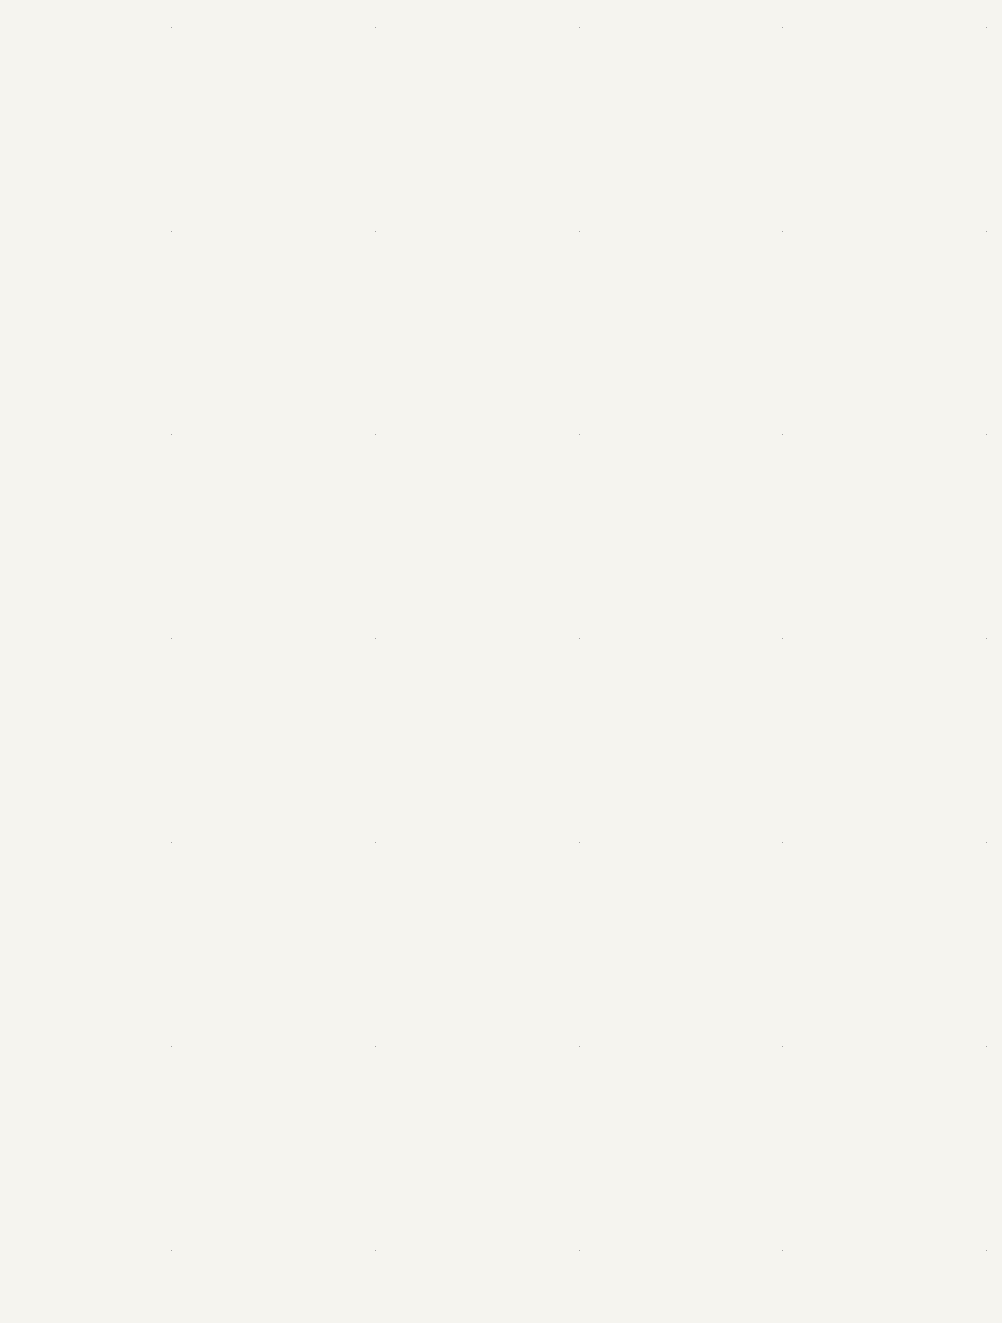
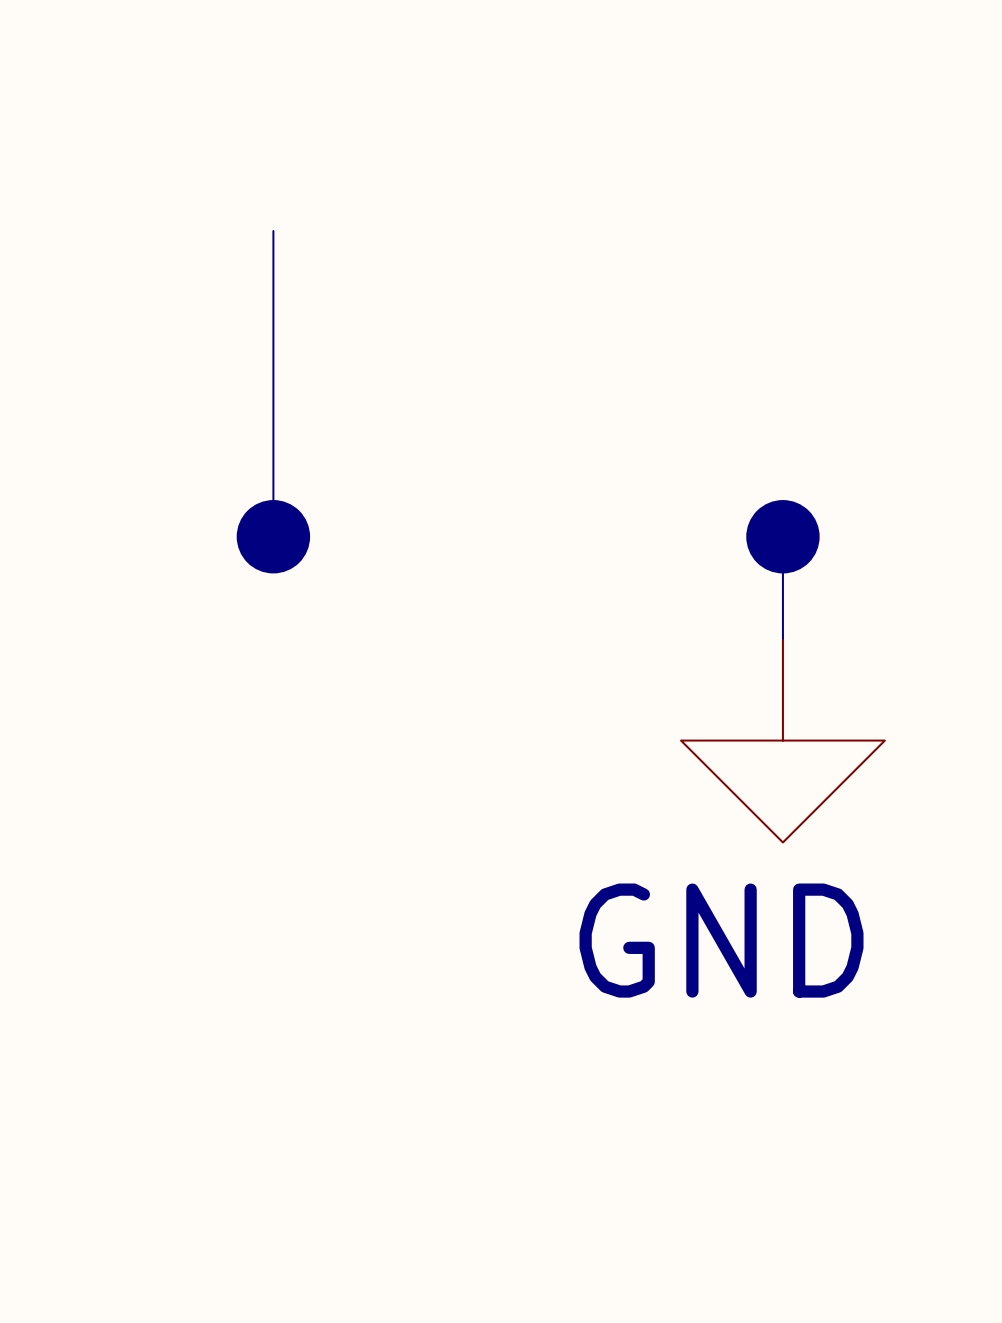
wire: none -> (273, 231) (273, 536)
junction: none -> (273, 536)
wire: none -> (782, 536) (782, 638)
junction: none -> (782, 536)
power symbol: none -> GND (782, 740)

